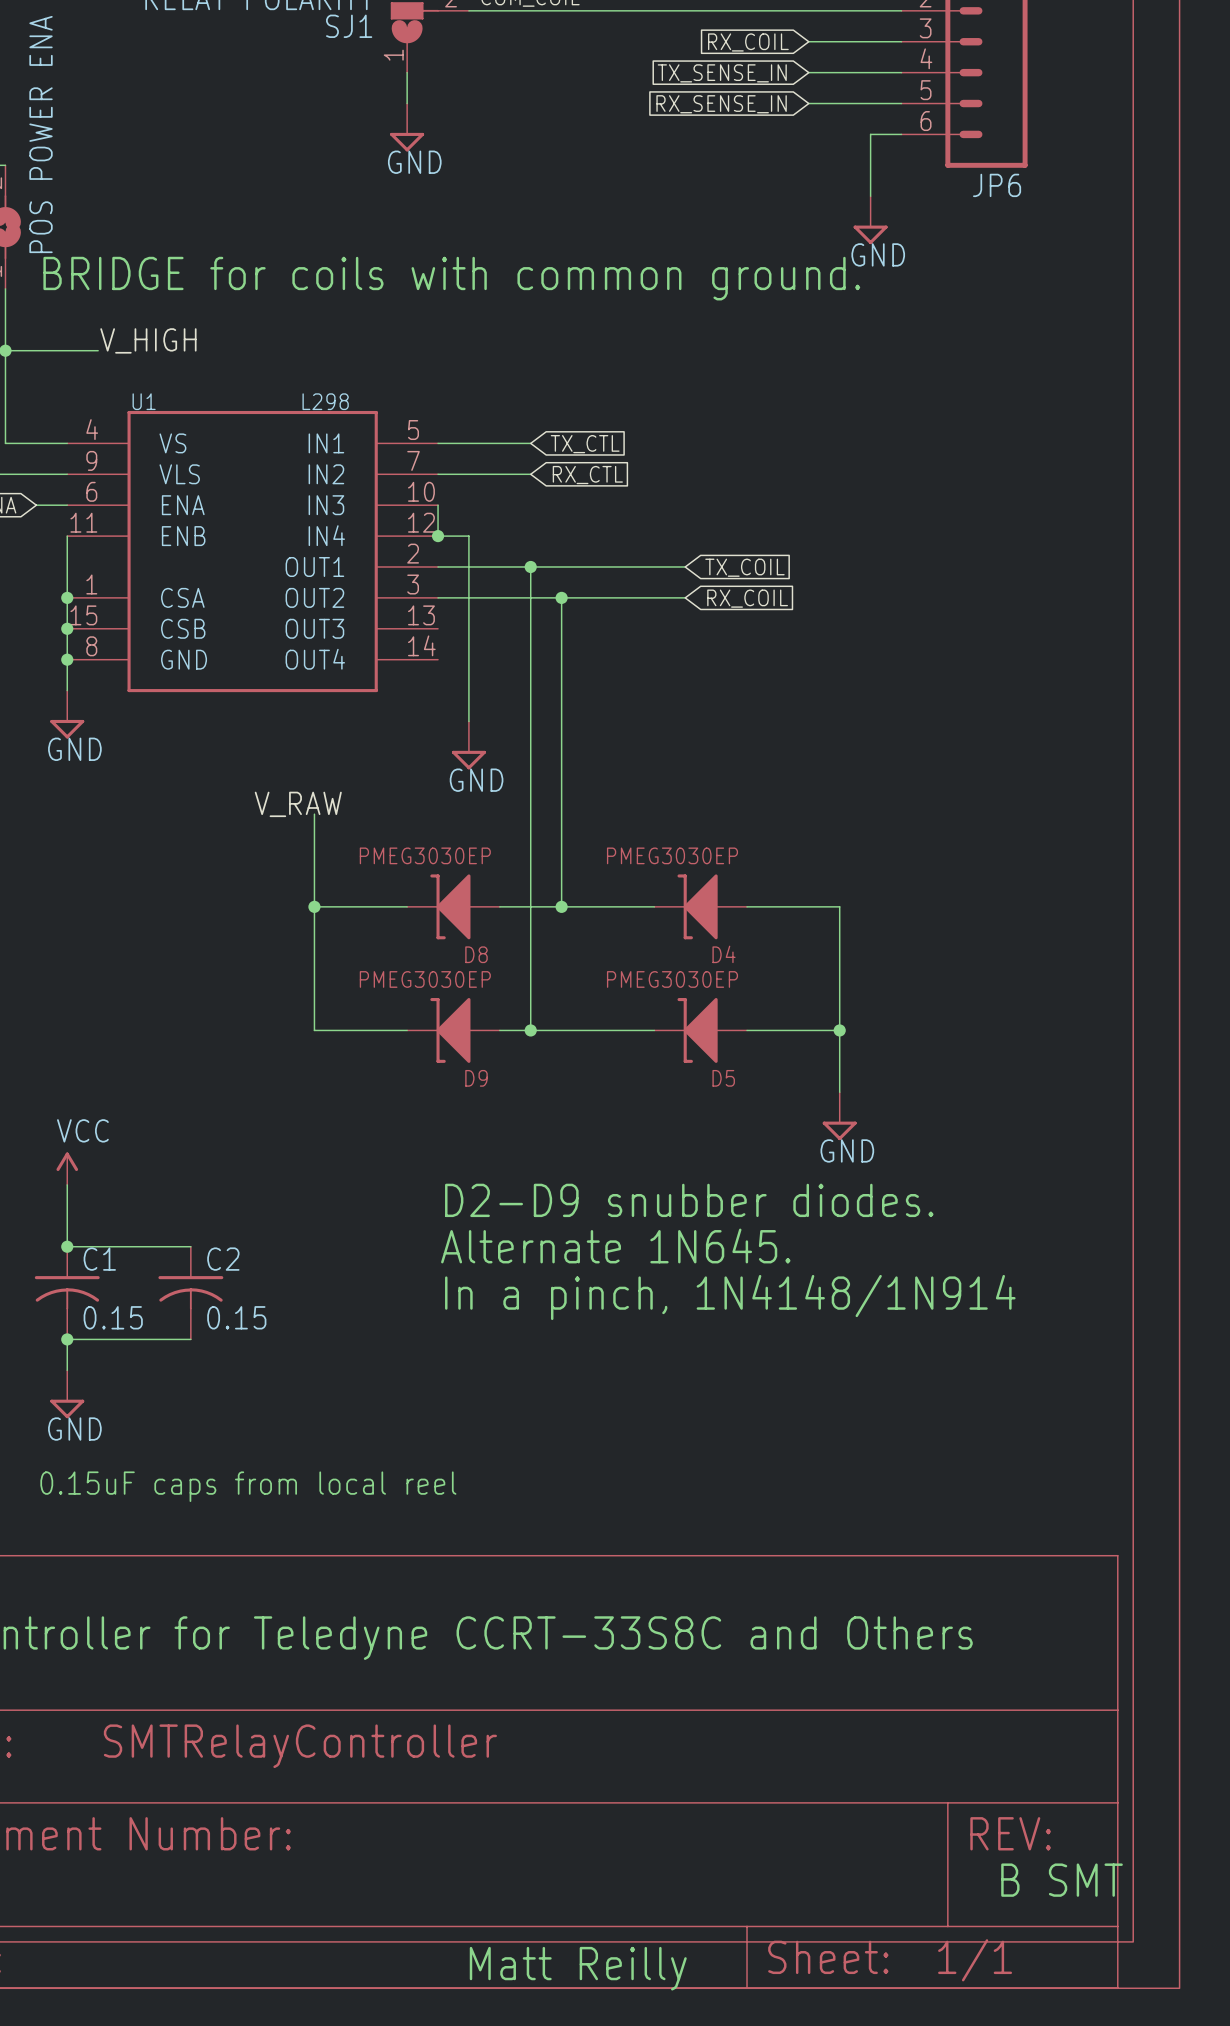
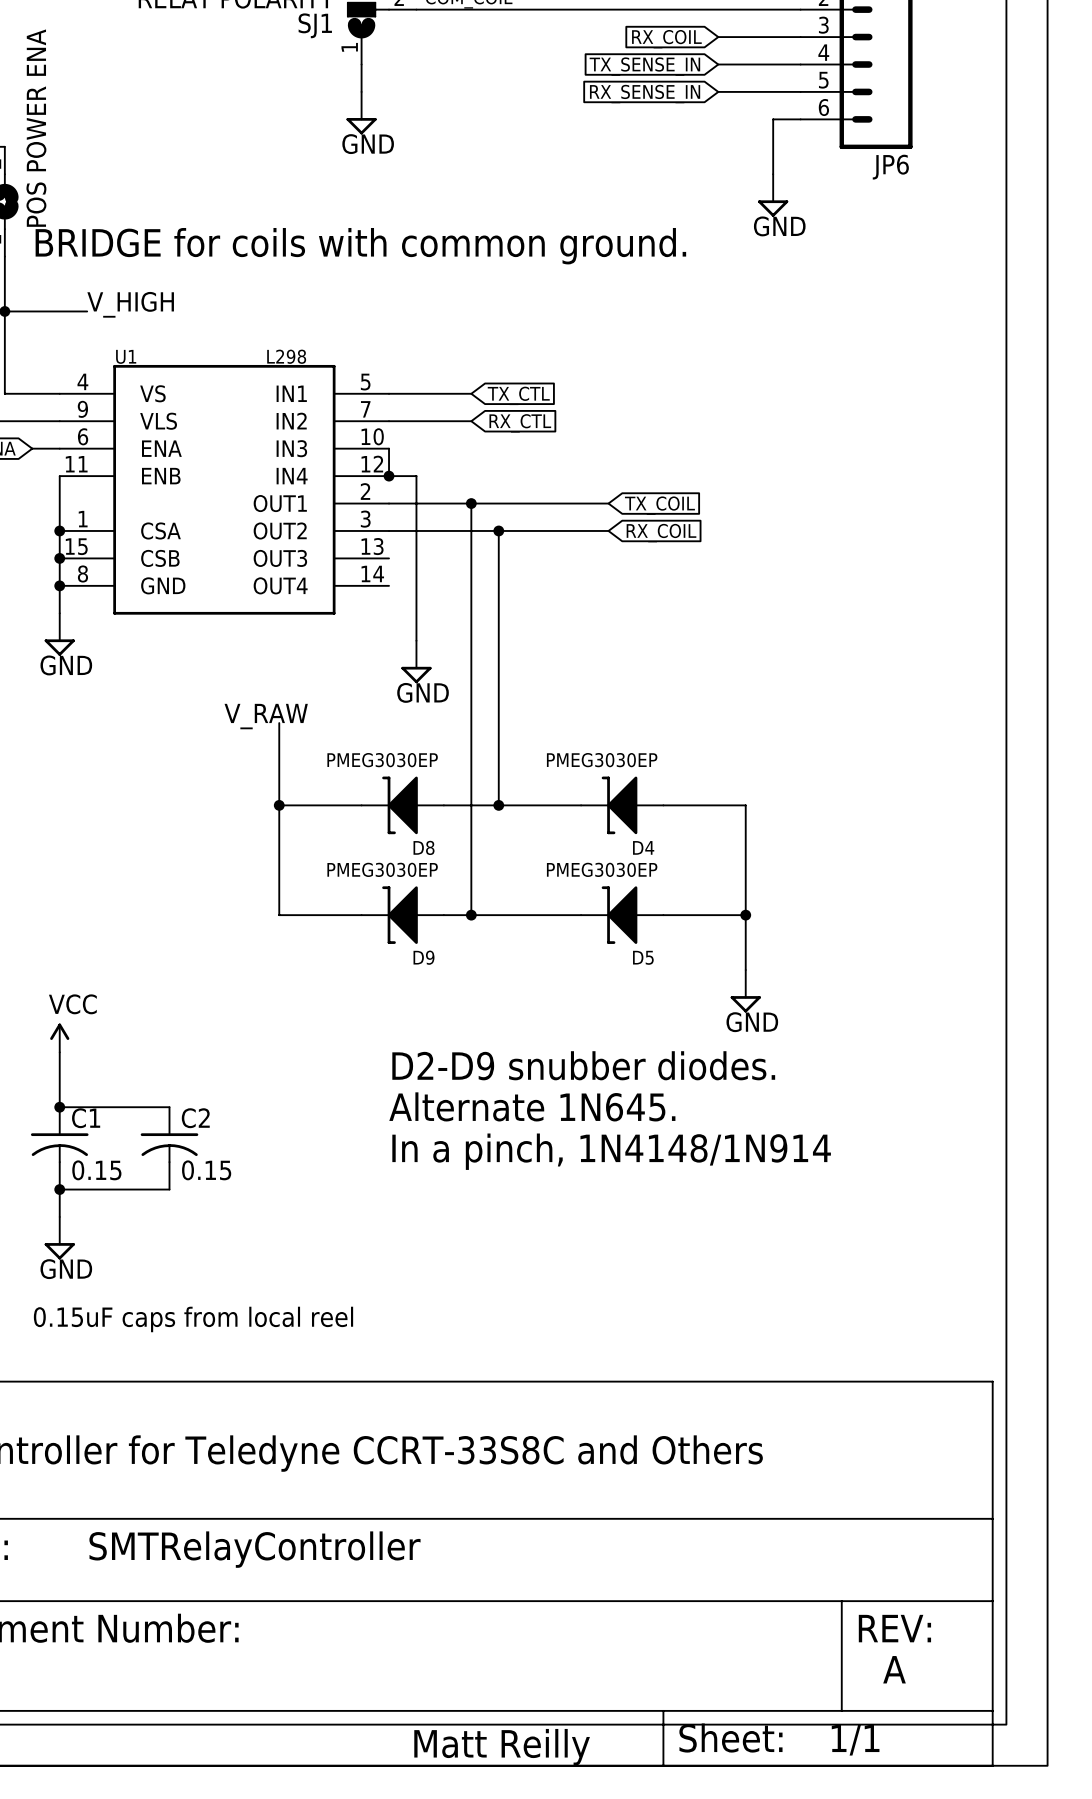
text: B SMT (1062, 1880) -> A (894, 1669)

